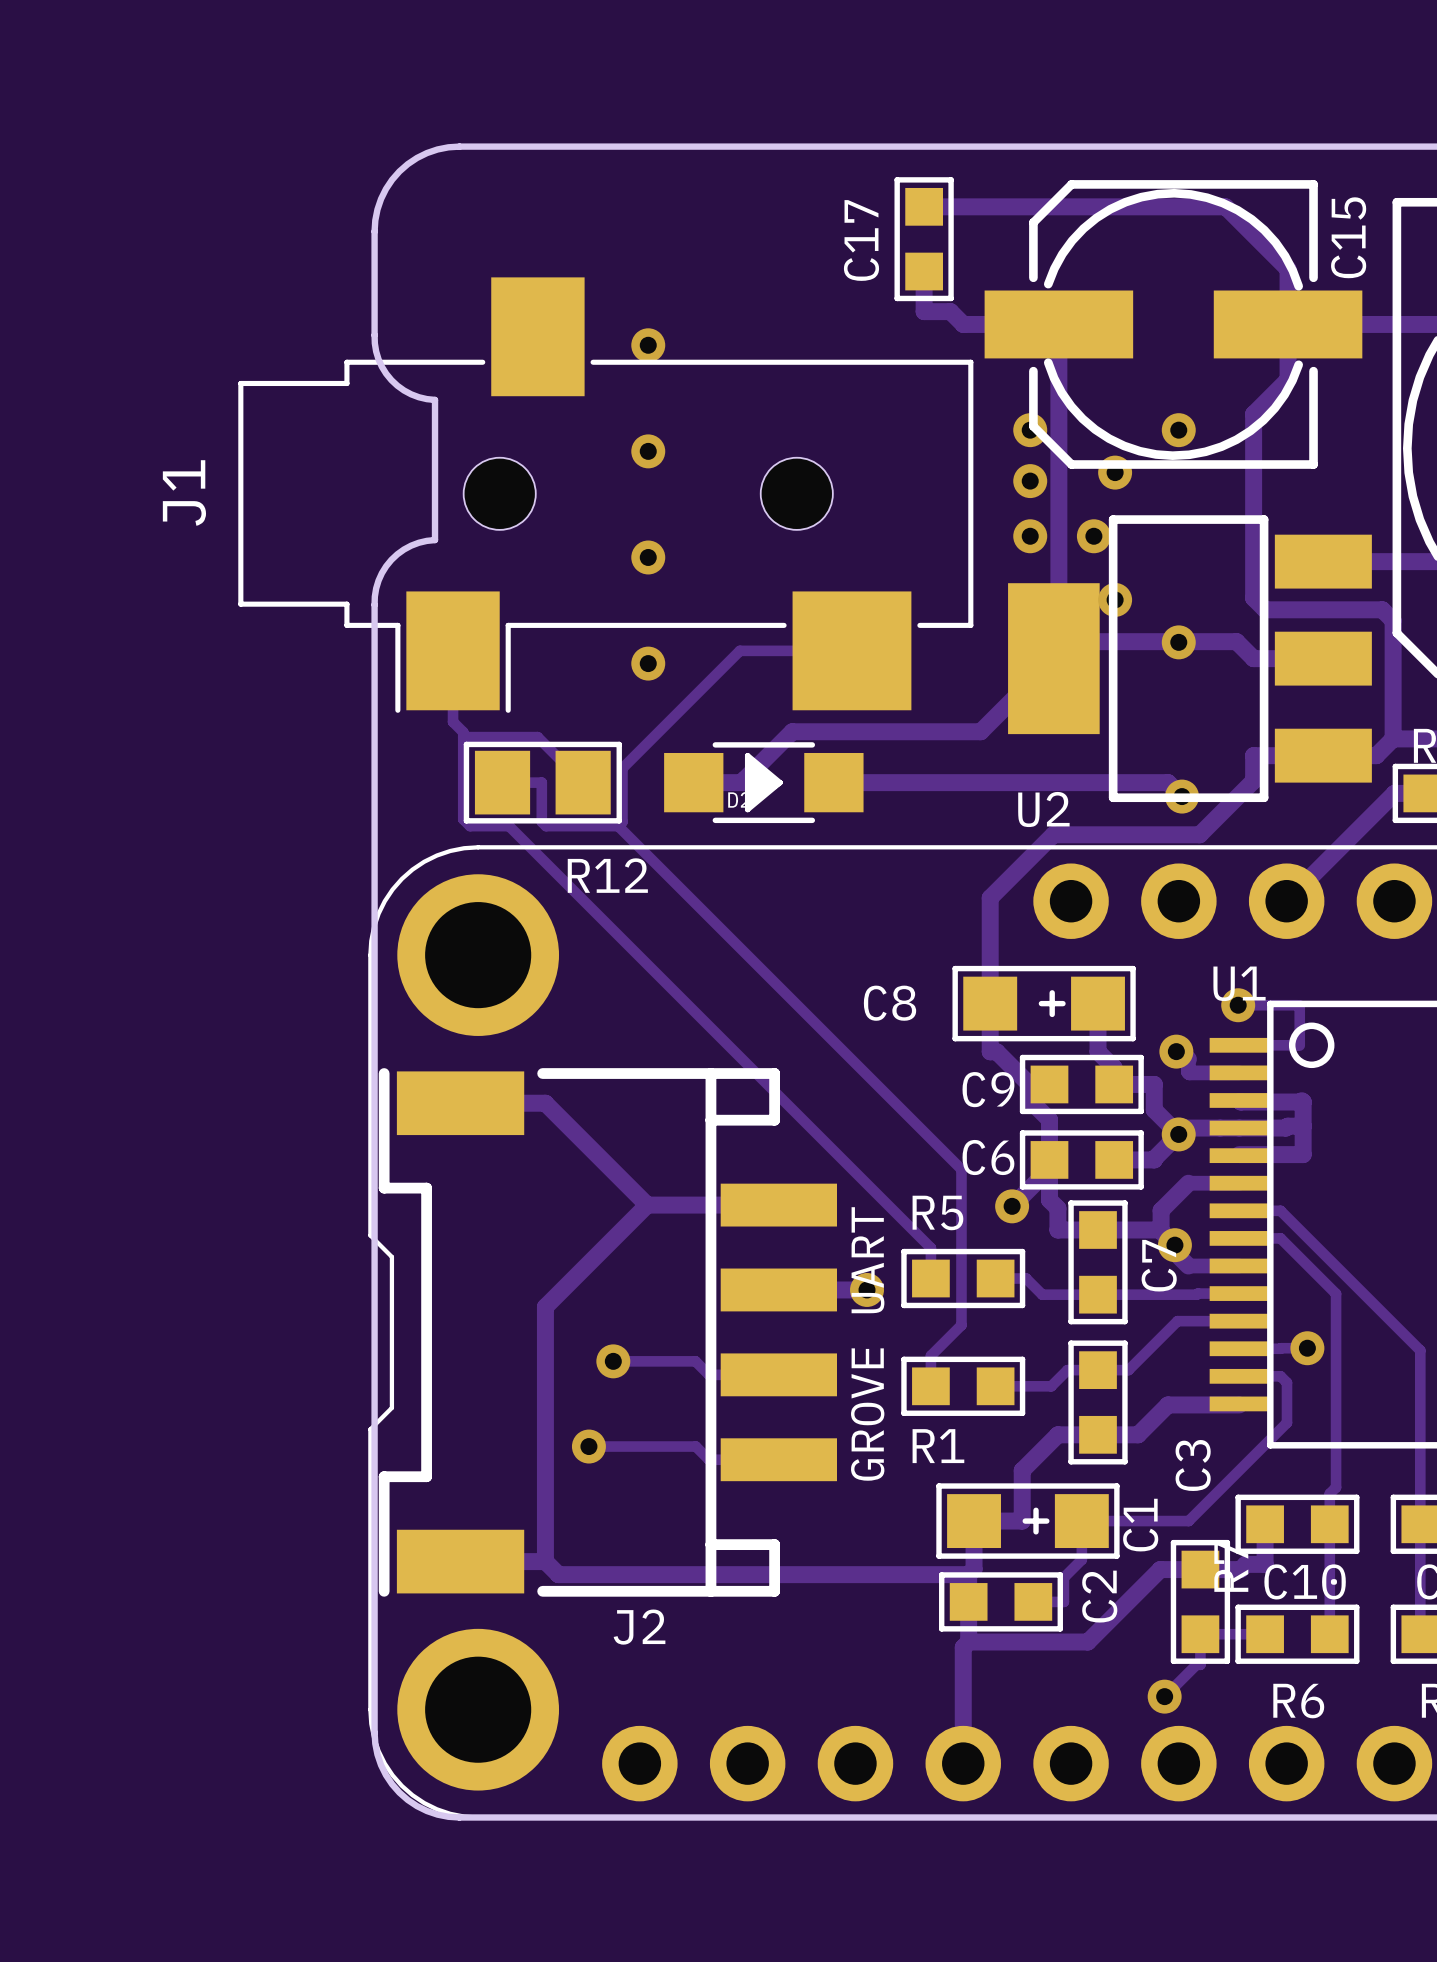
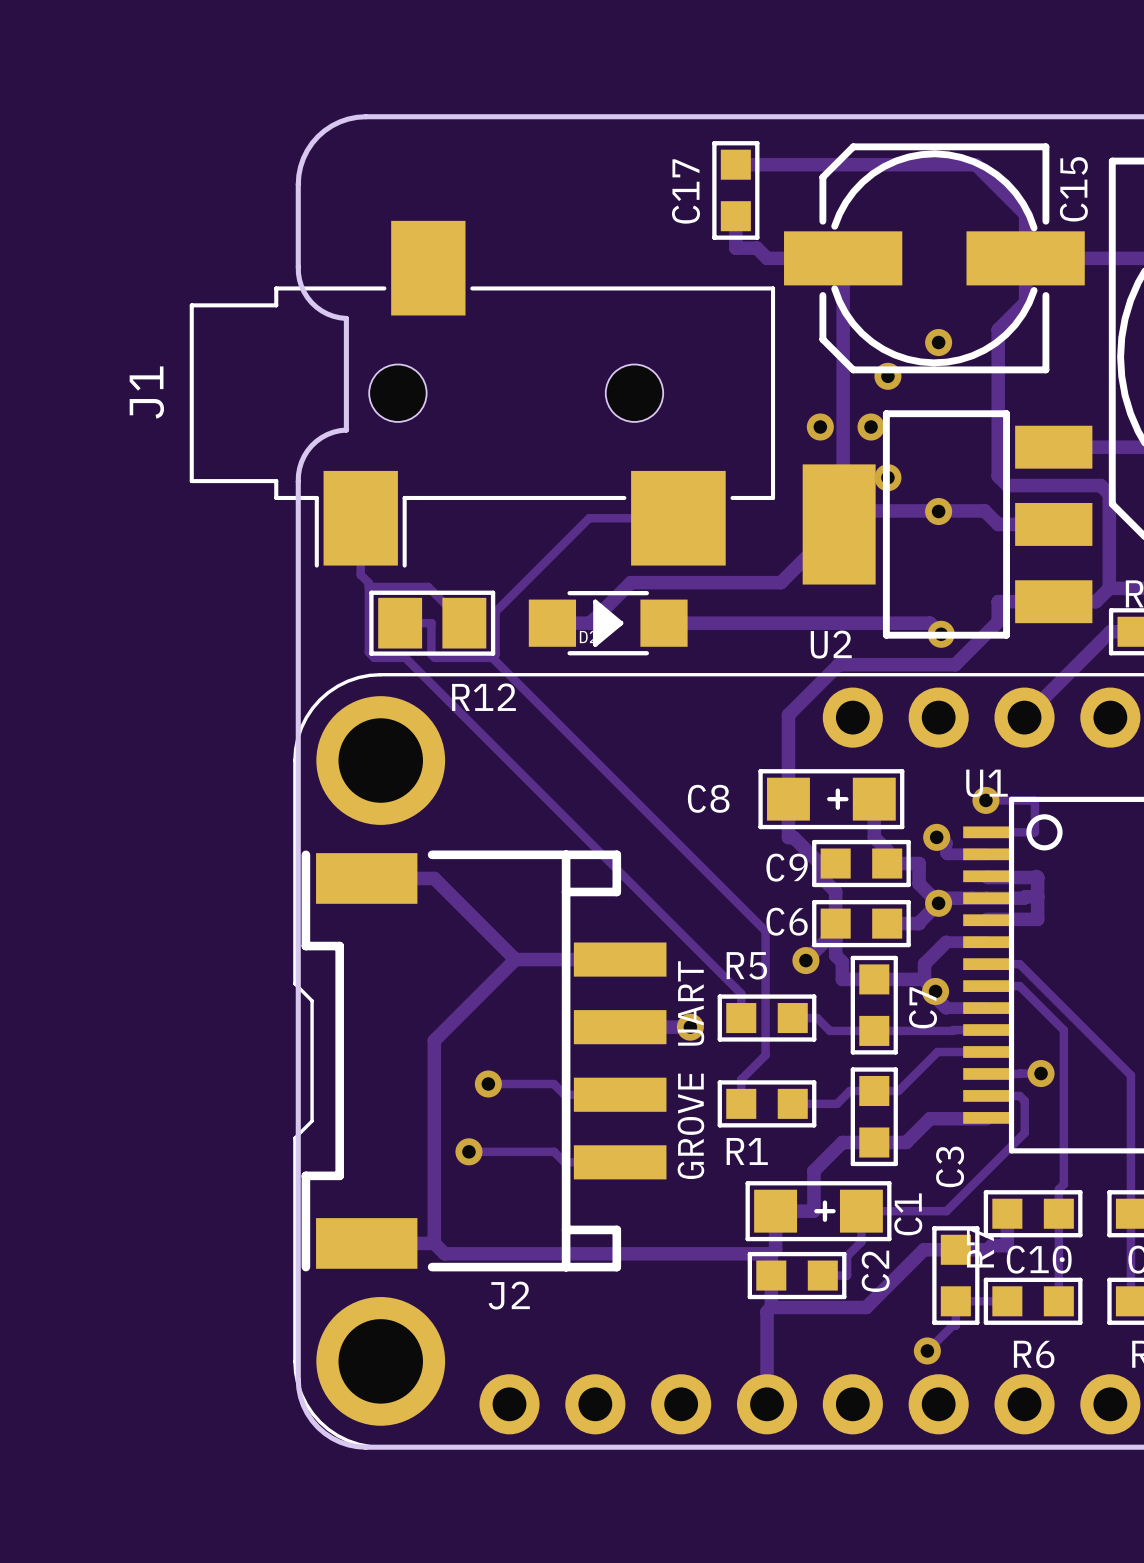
via: (648, 345) -> none
via: (1030, 430) -> none
via: (648, 451) -> none
via: (1030, 481) -> none
via: (648, 557) -> none
via: (648, 663) -> none

